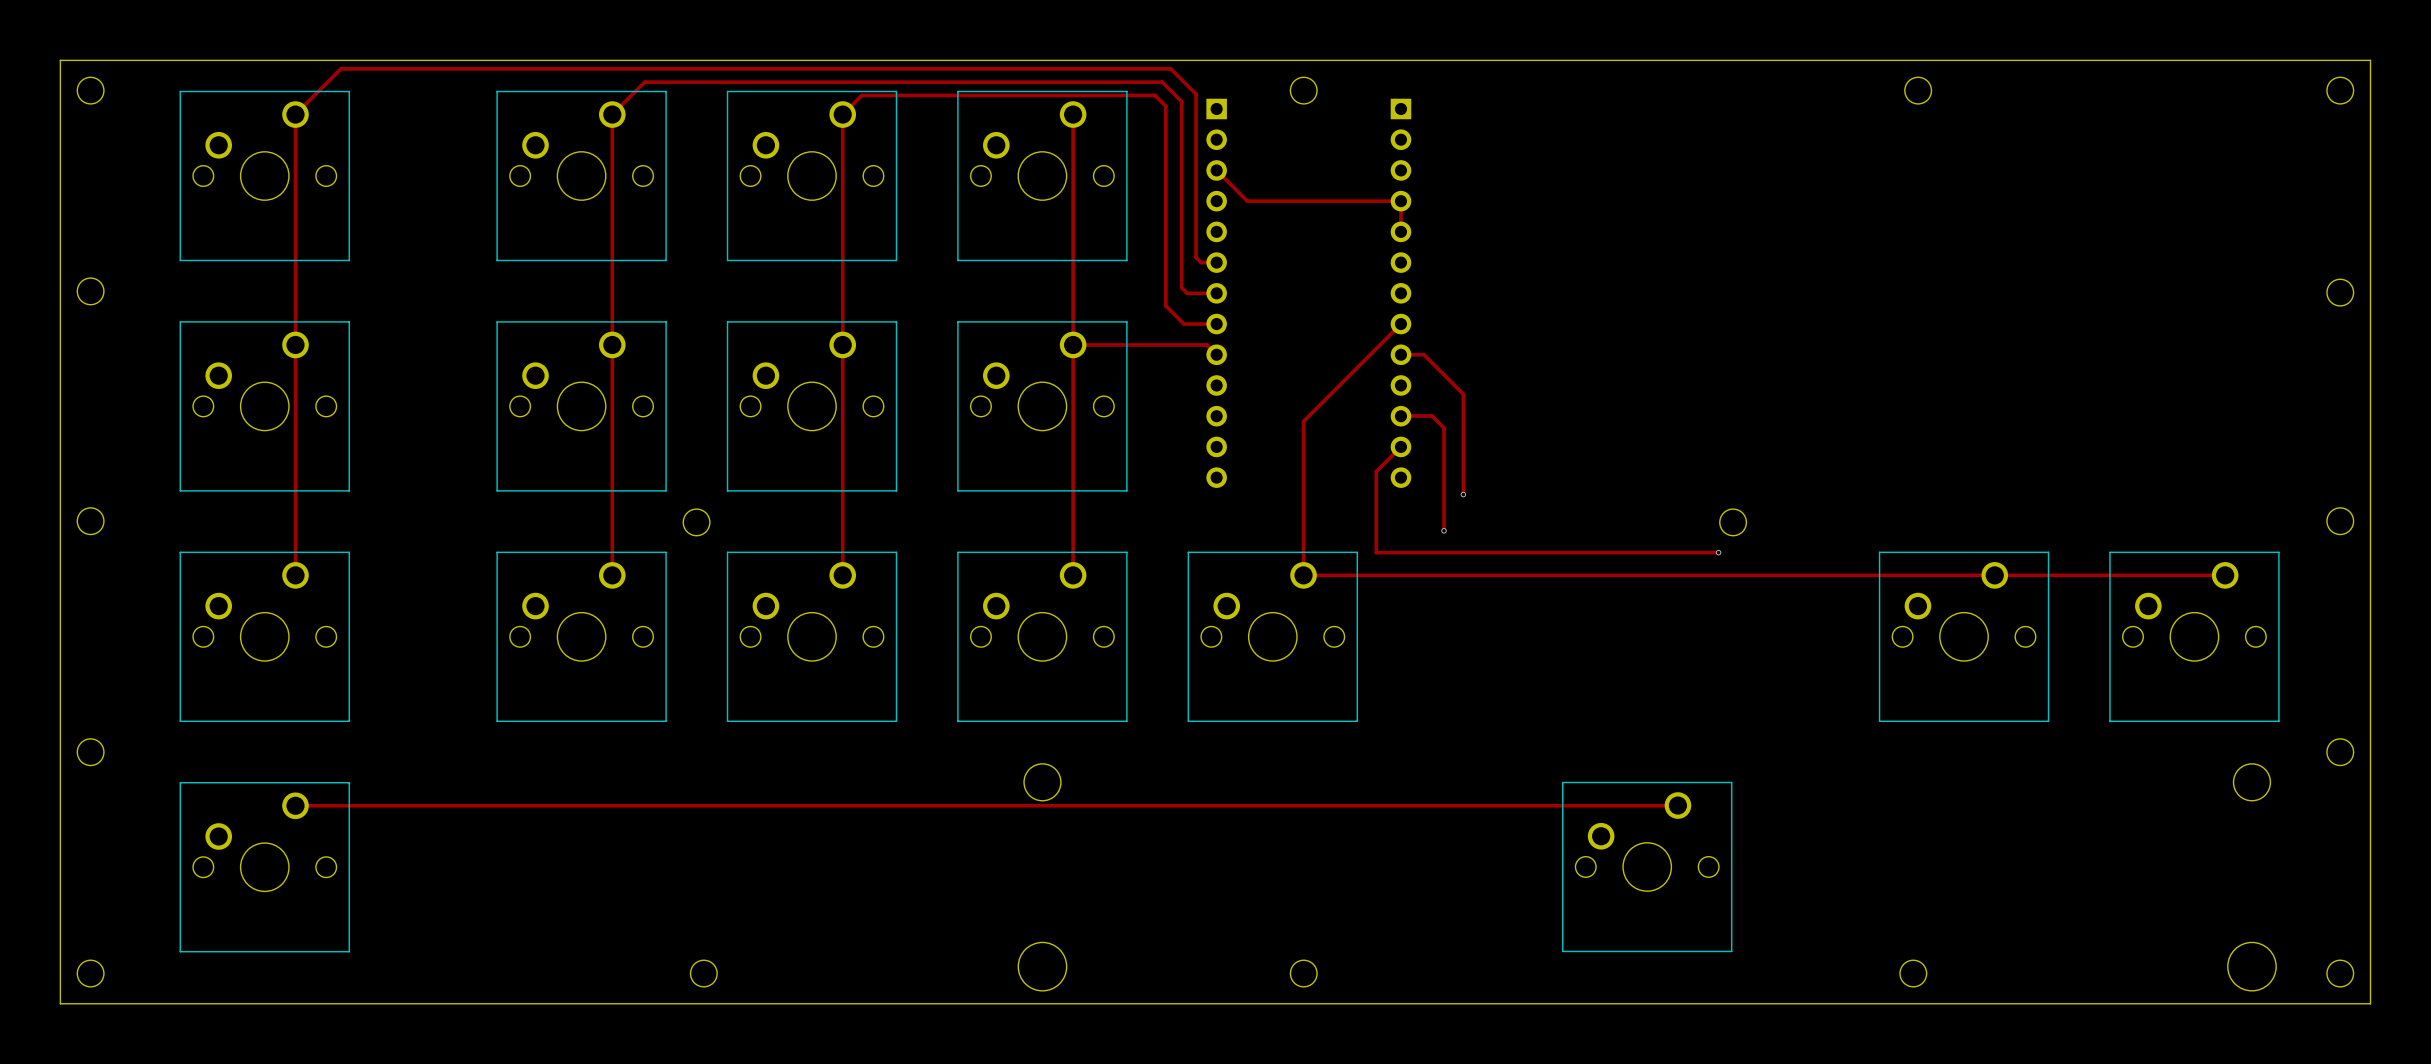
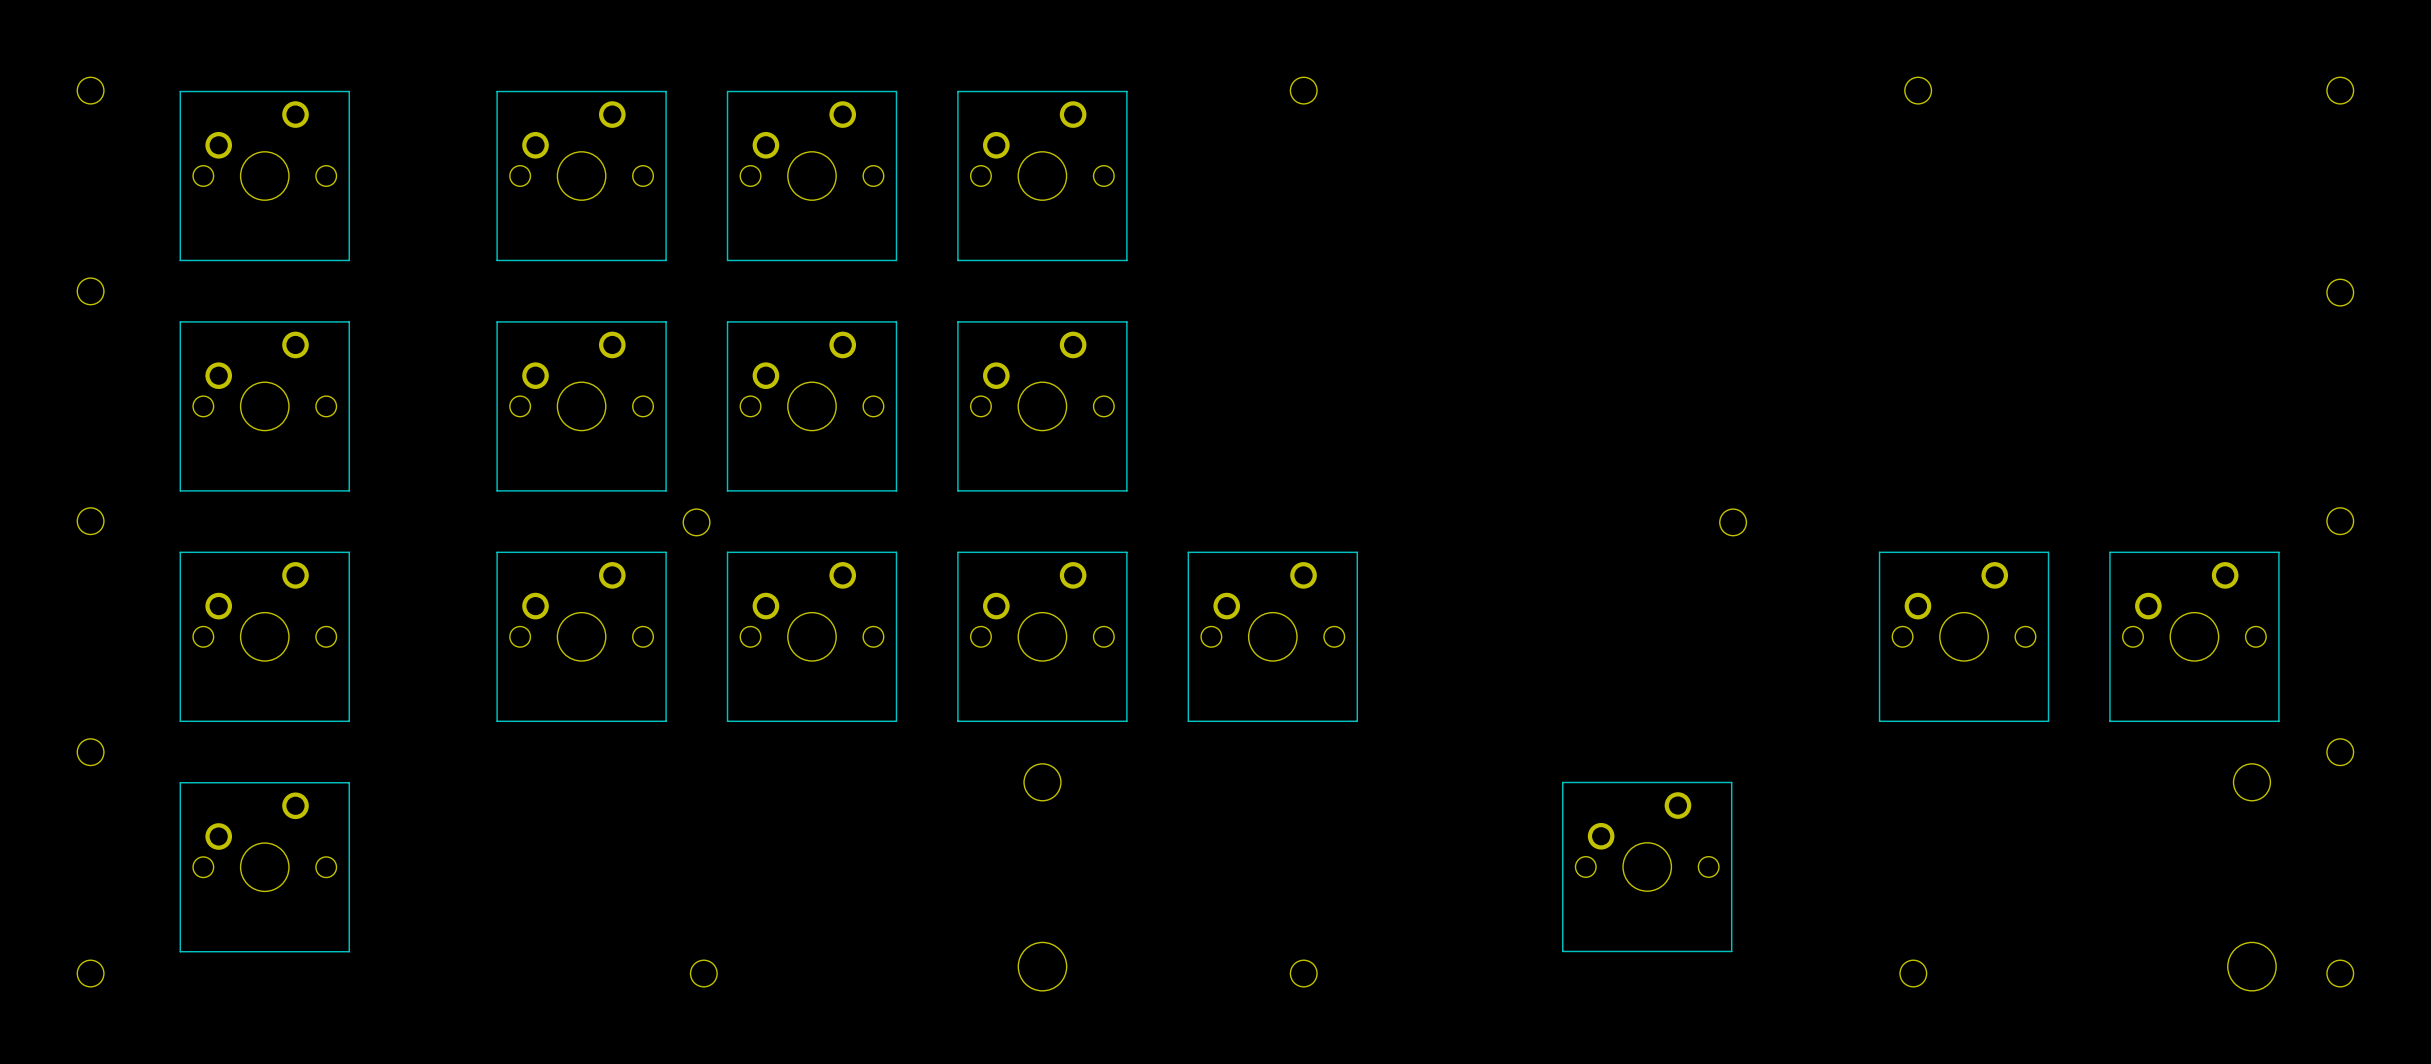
board edge: (60, 60) (2370, 60) (2370, 1003) (60, 1003) (60, 60) -> none
track: (1073, 114) (1073, 575) -> none
track: (1216, 170) (1247, 201) (1400, 201) (1400, 231) -> none
track: (1216, 262) (1201, 262) (1196, 257) (1196, 94) (1170, 68) (340, 68) (295, 114) (295, 575) -> none
track: (1216, 293) (1187, 293) (1181, 287) (1181, 101) (1162, 82) (644, 82) (612, 114) (612, 575) -> none
part: (1216, 293) -> none
part: (1400, 293) -> none
track: (1216, 324) (1183, 324) (1165, 305) (1165, 106) (1154, 95) (861, 95) (842, 114) (842, 575) -> none
track: (1400, 324) (1303, 421) (1303, 575) (2225, 575) -> none
track: (1073, 344) (1206, 344) (1216, 354) -> none
track: (1400, 354) (1423, 354) (1463, 394) (1463, 494) -> none
track: (1400, 416) (1431, 415) (1444, 428) (1444, 530) -> none
track: (1400, 446) (1376, 471) (1376, 552) (1718, 552) -> none
via: (1463, 494) -> none
via: (1444, 530) -> none
via: (1718, 552) -> none
track: (1677, 805) (295, 805) -> none

